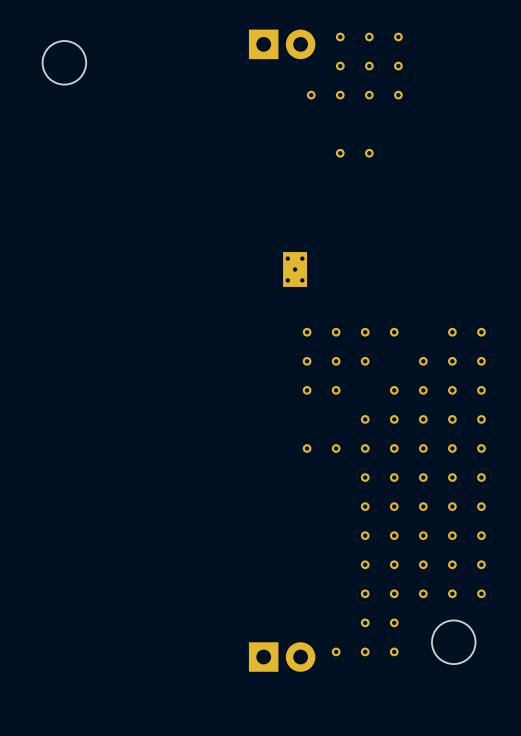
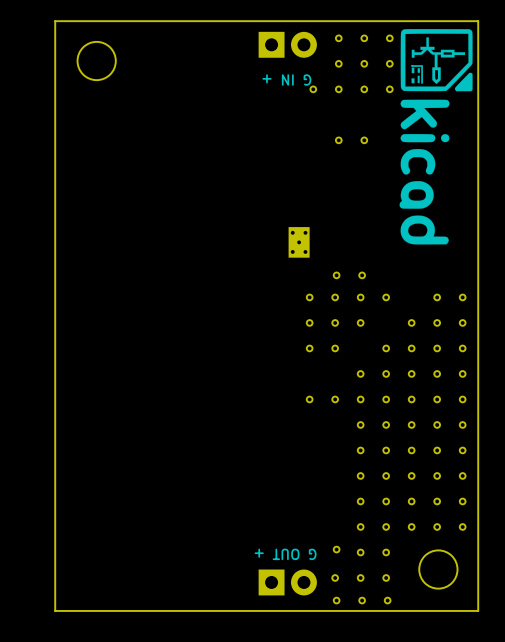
board edge: none -> (478, 21) (478, 610) (55, 610) (55, 21) (478, 21)
drawing: none -> [399, 29, 473, 245]
text: none -> G IN + (286, 80)
part: none -> (336, 275)
part: none -> (362, 275)
part: none -> (336, 549)
text: none -> G OUT + (285, 554)
part: none -> (336, 600)
part: none -> (362, 600)
part: none -> (387, 600)

